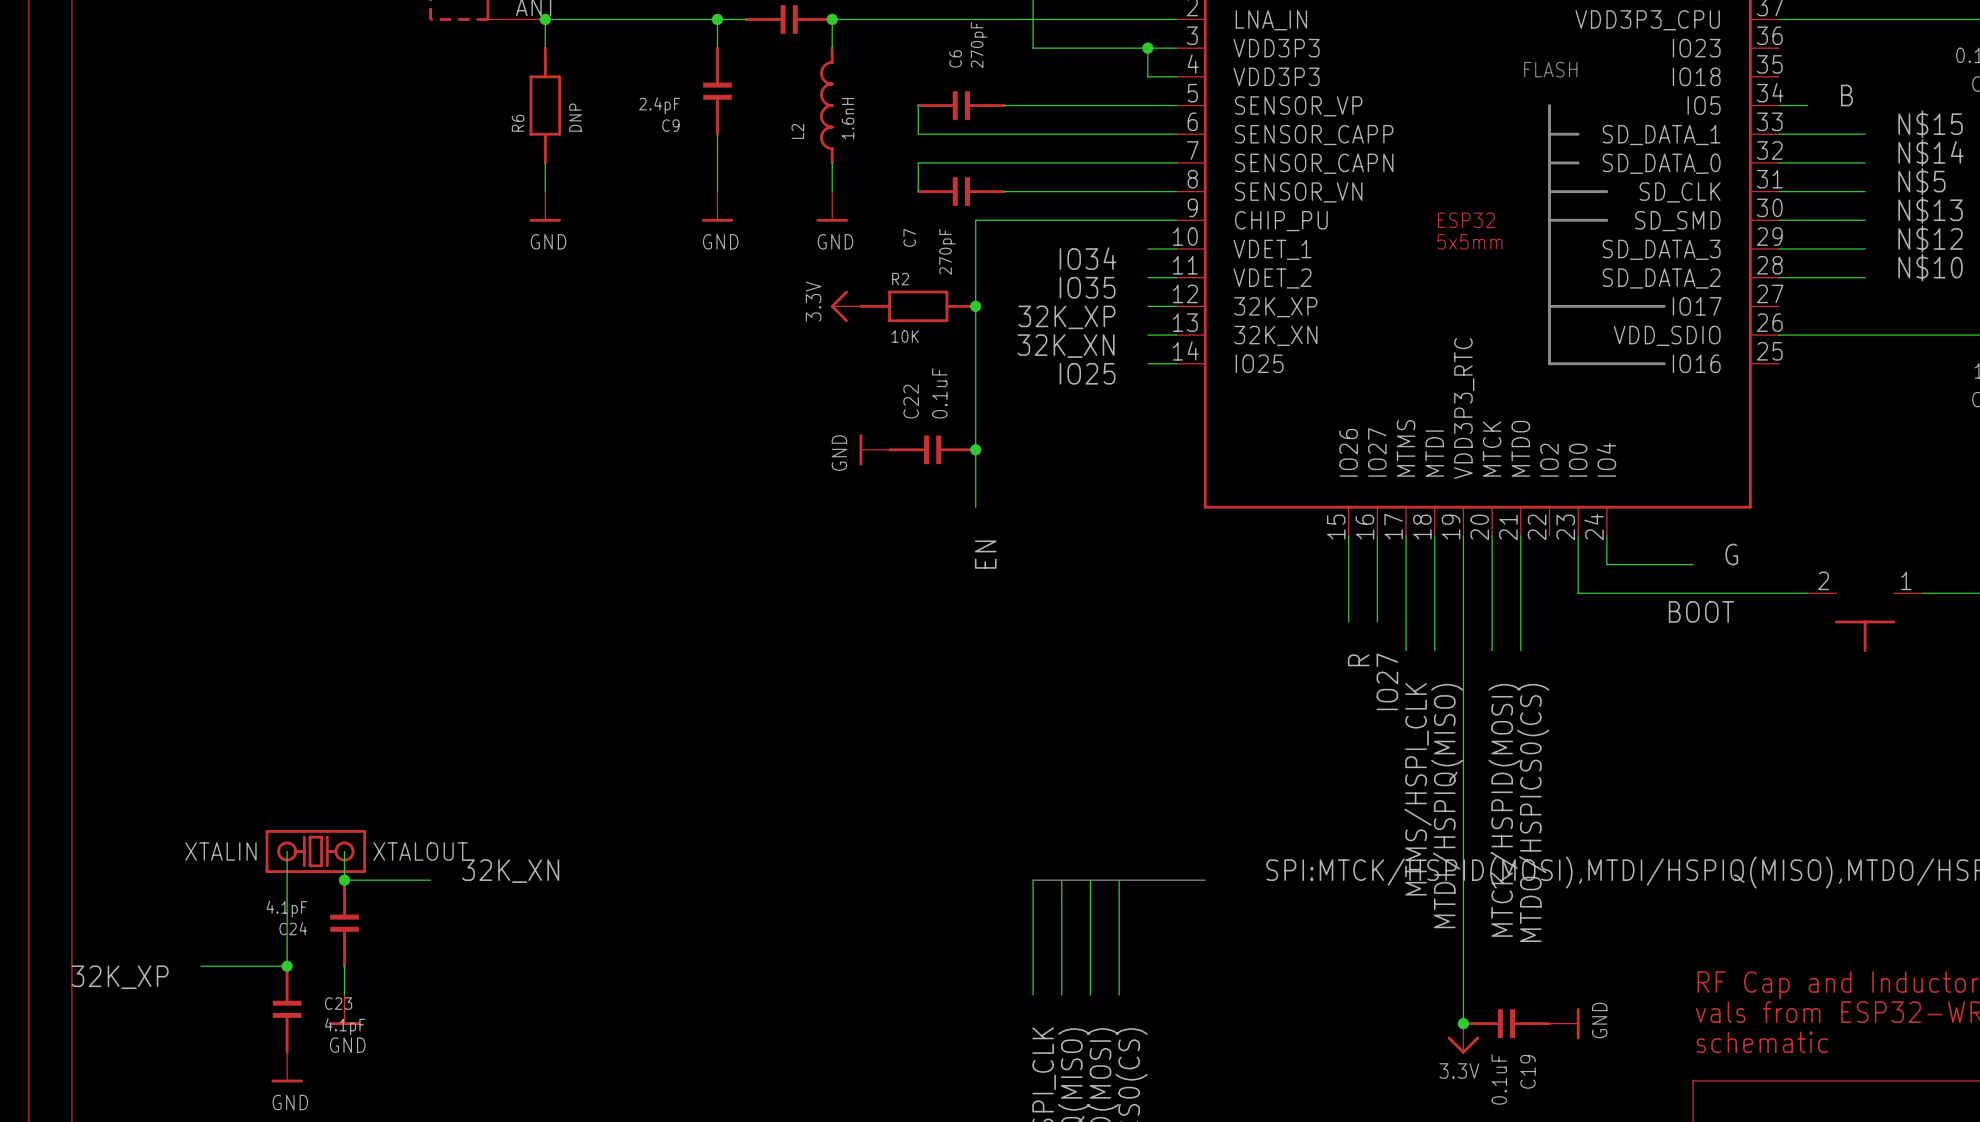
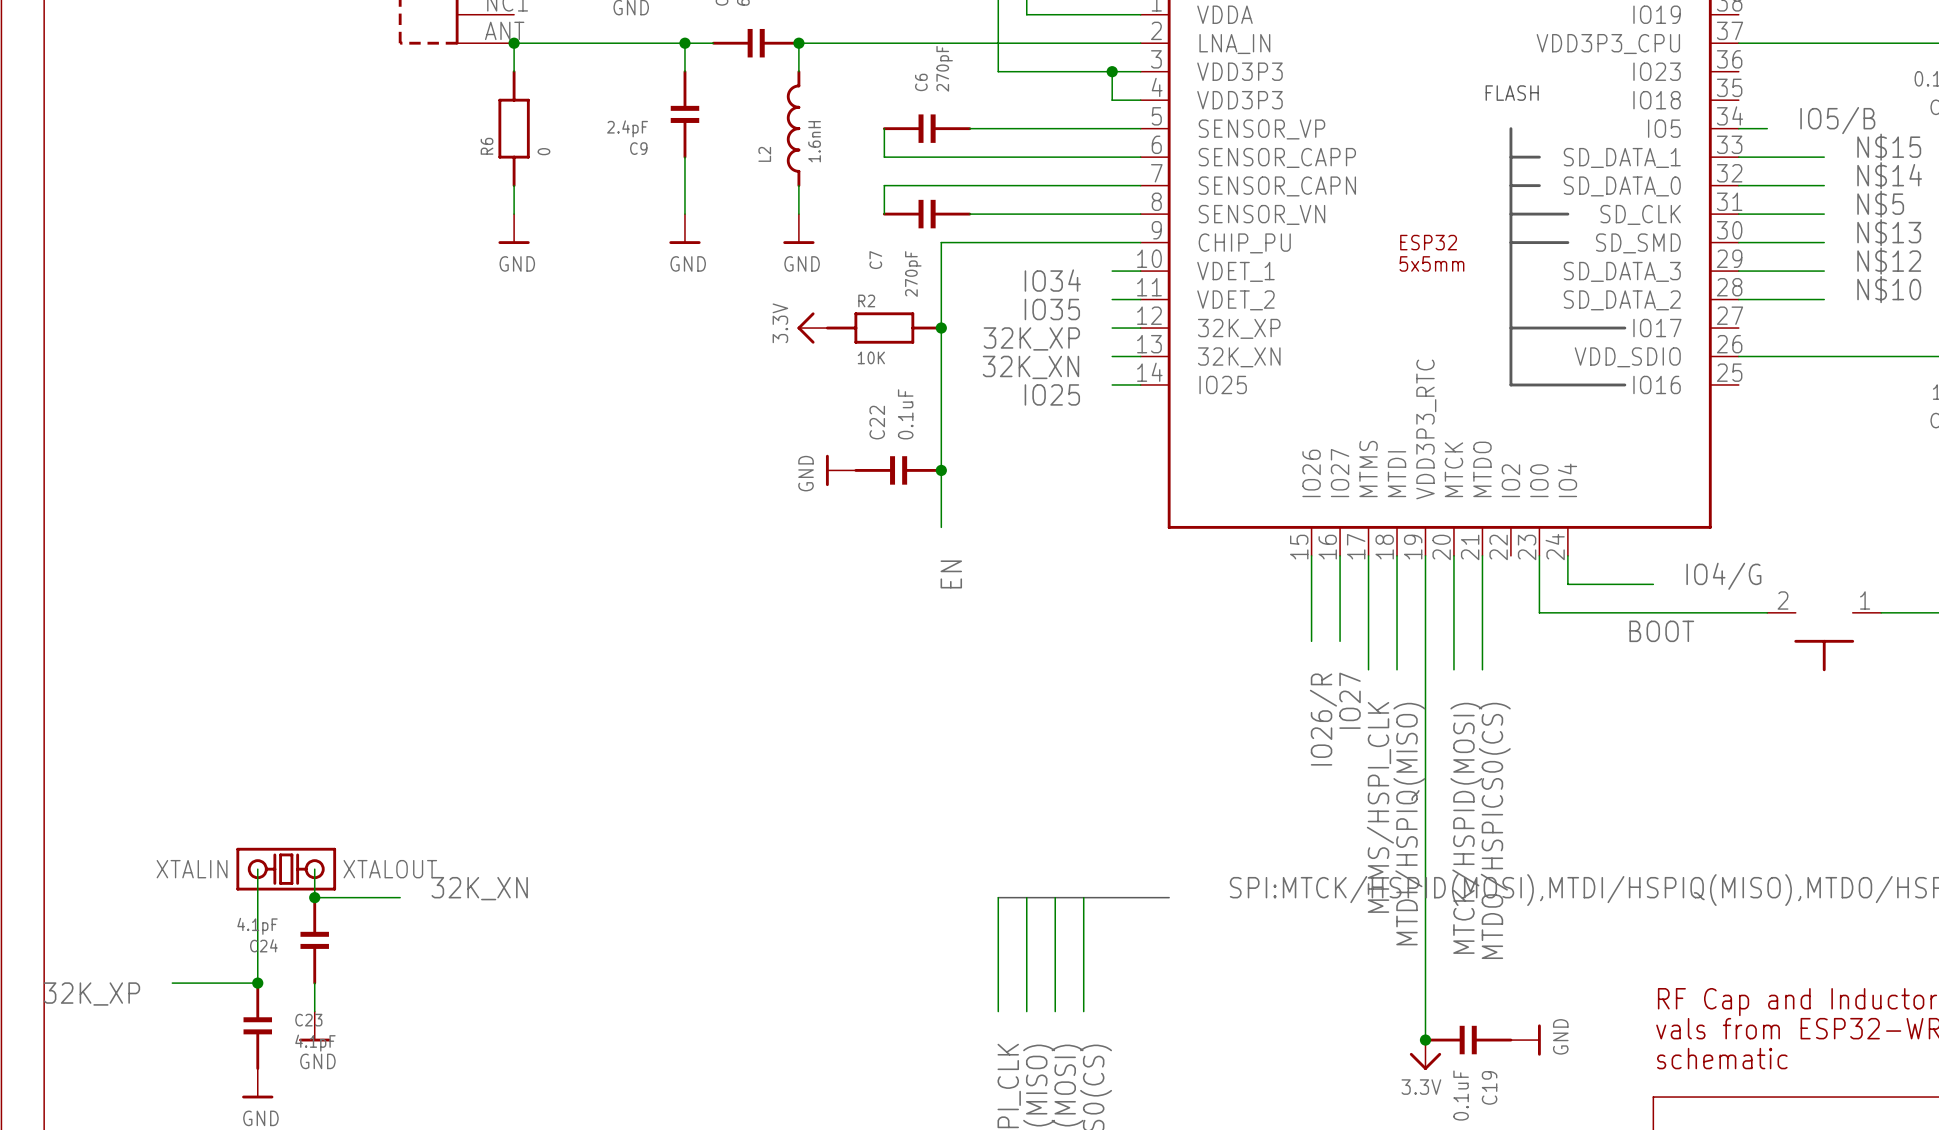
label: B (1846, 95) -> IO5/B (1837, 120)
R6 value: DNP (575, 117) -> 0 (544, 151)
label: G (1731, 554) -> IO4/G (1723, 576)
label: R (1358, 660) -> IO26/R (1323, 719)

